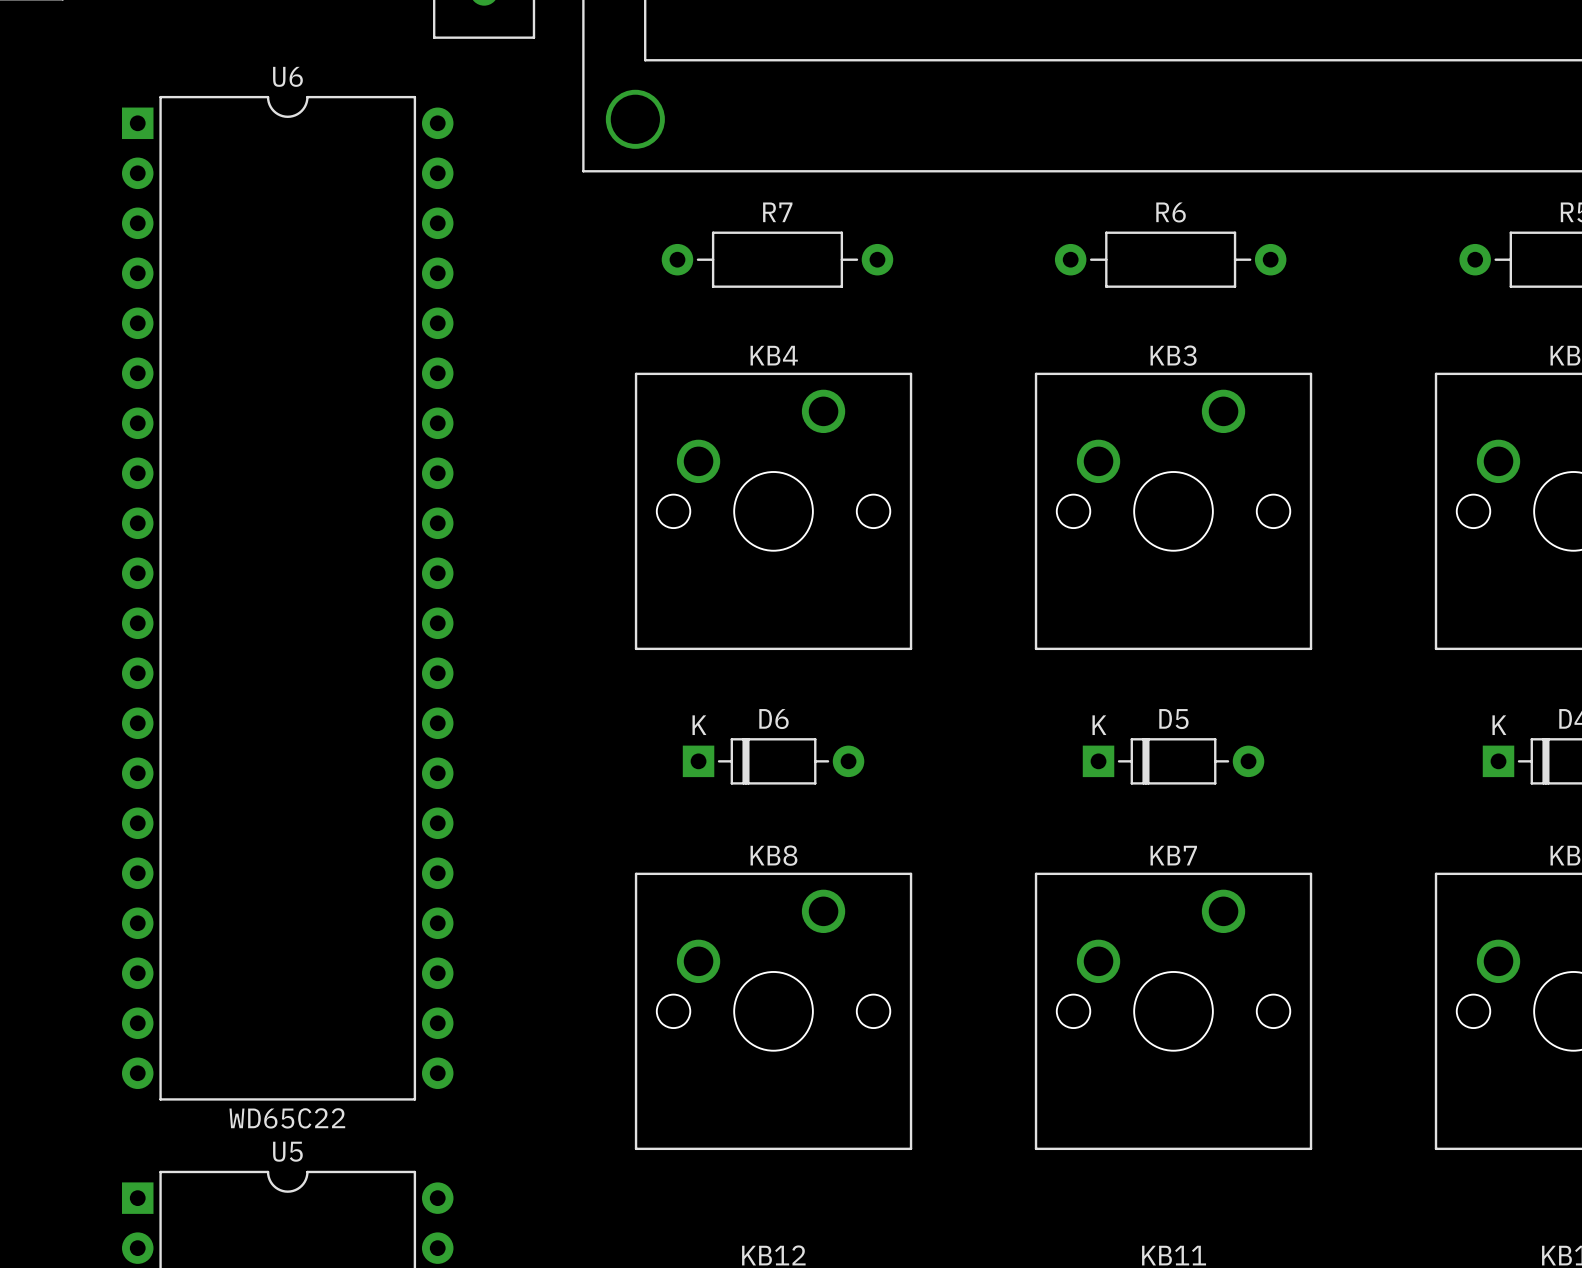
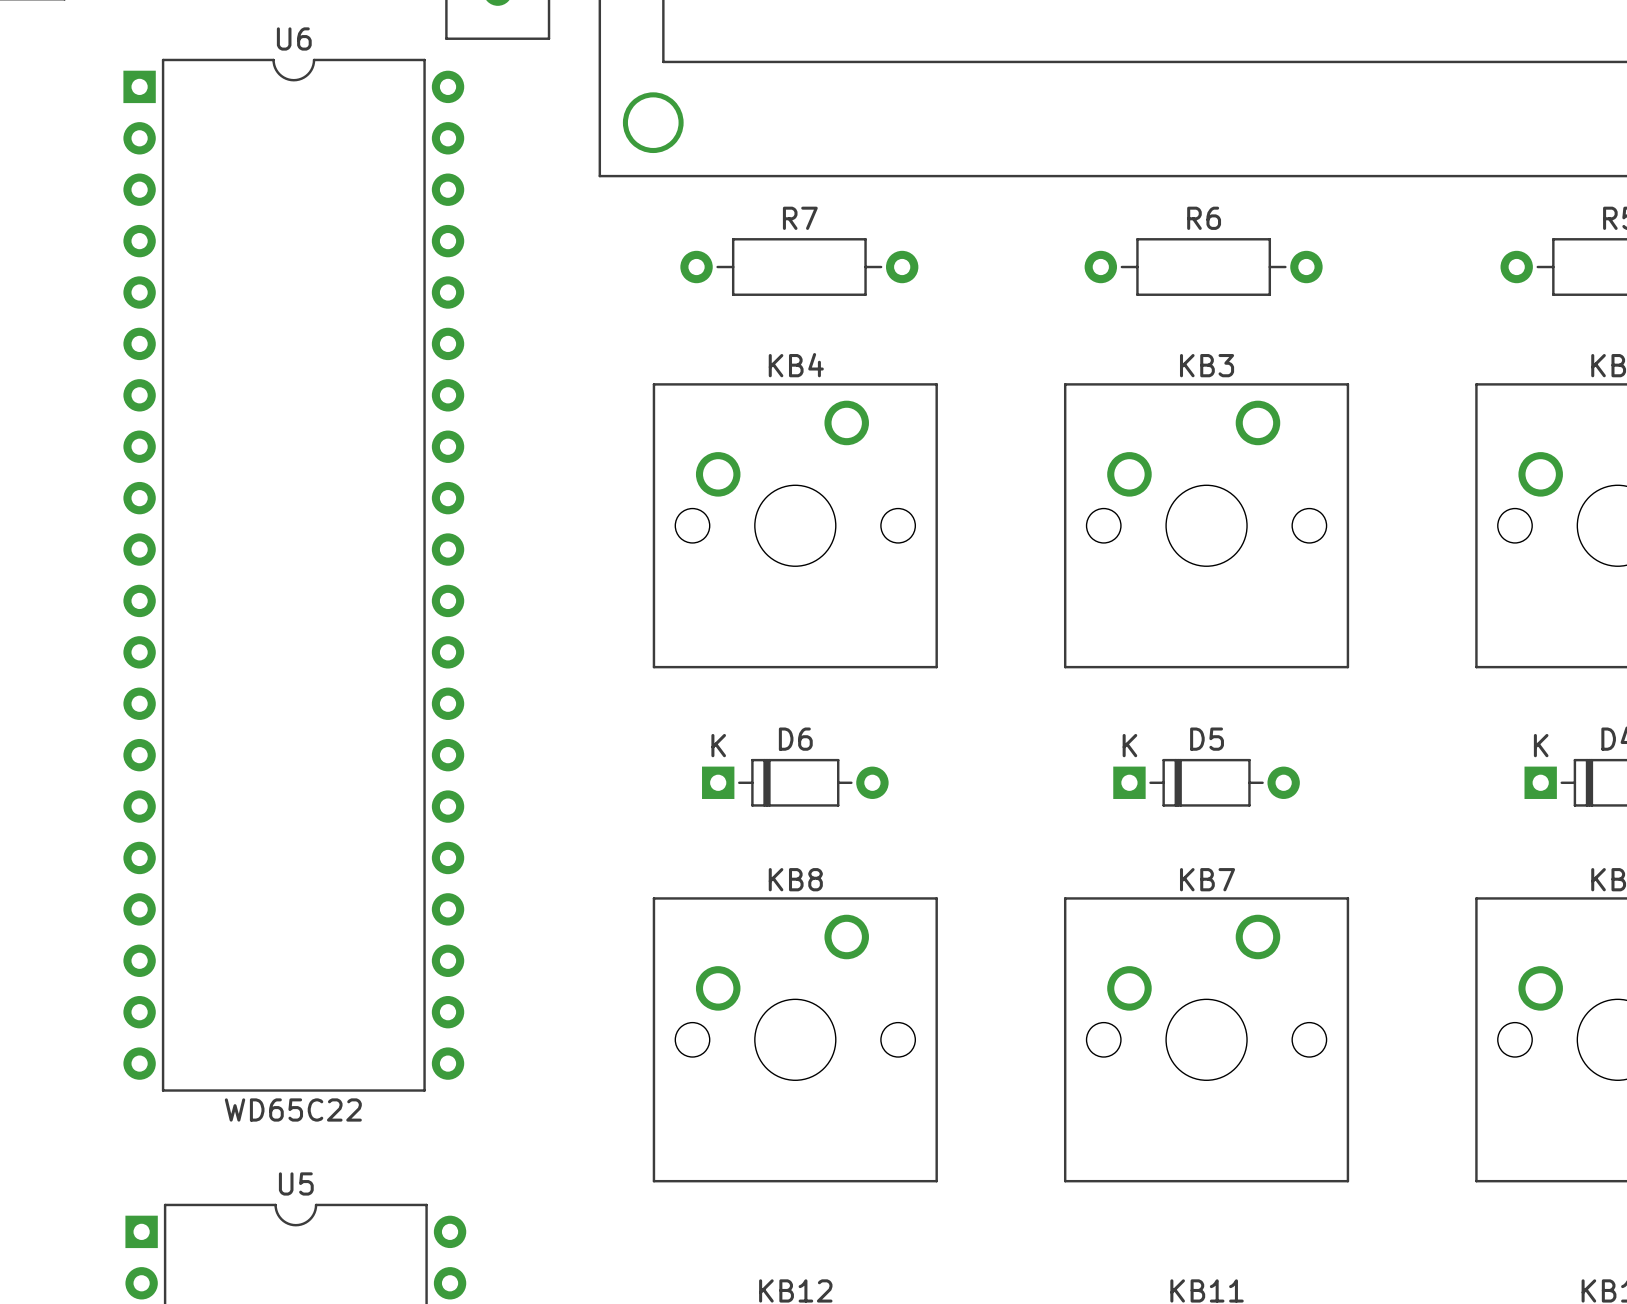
U6 position: (287, 598) -> (293, 575)

